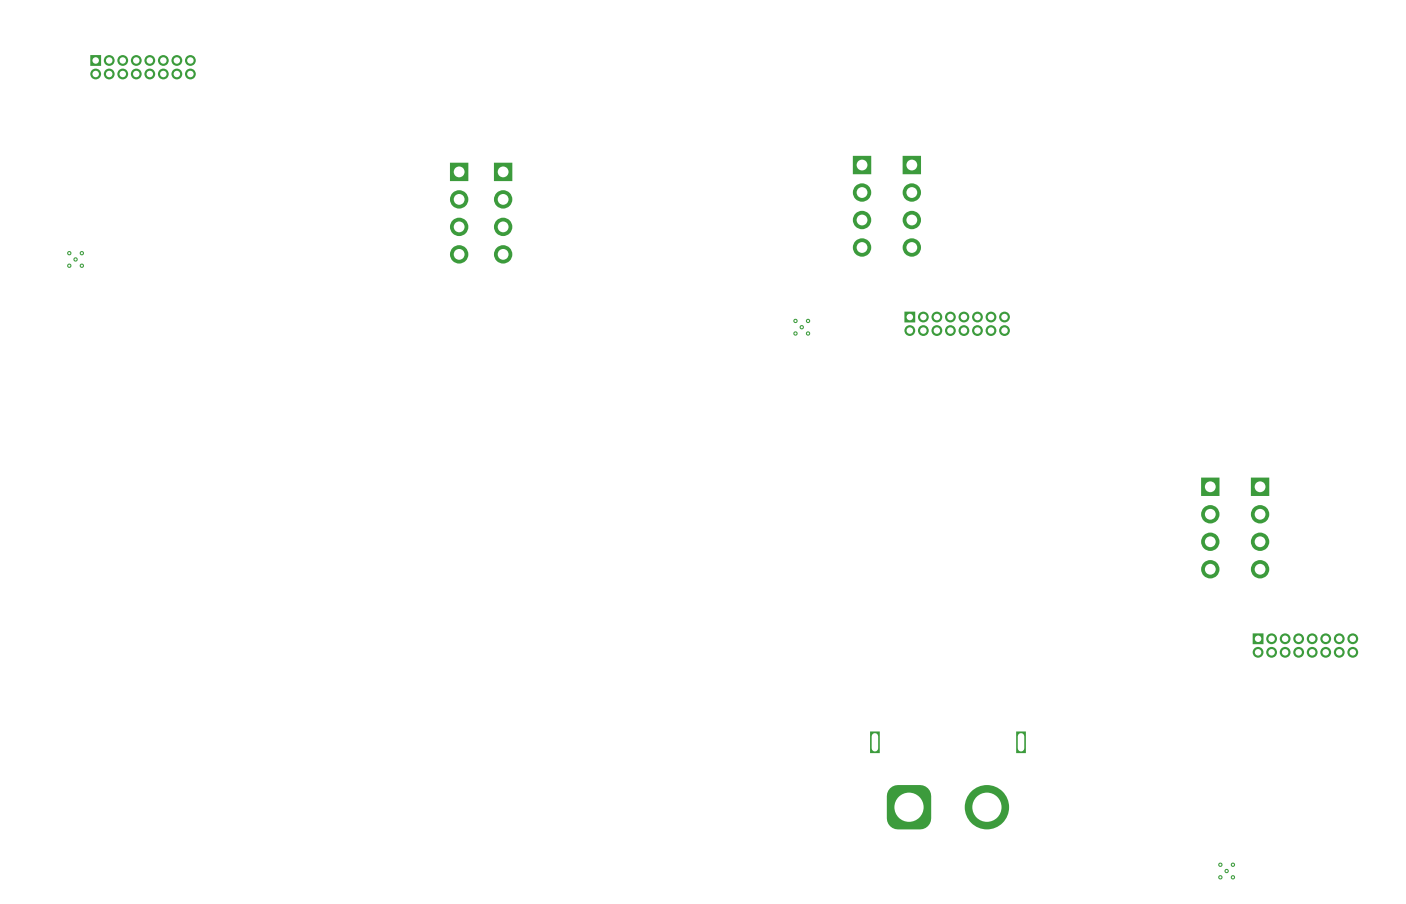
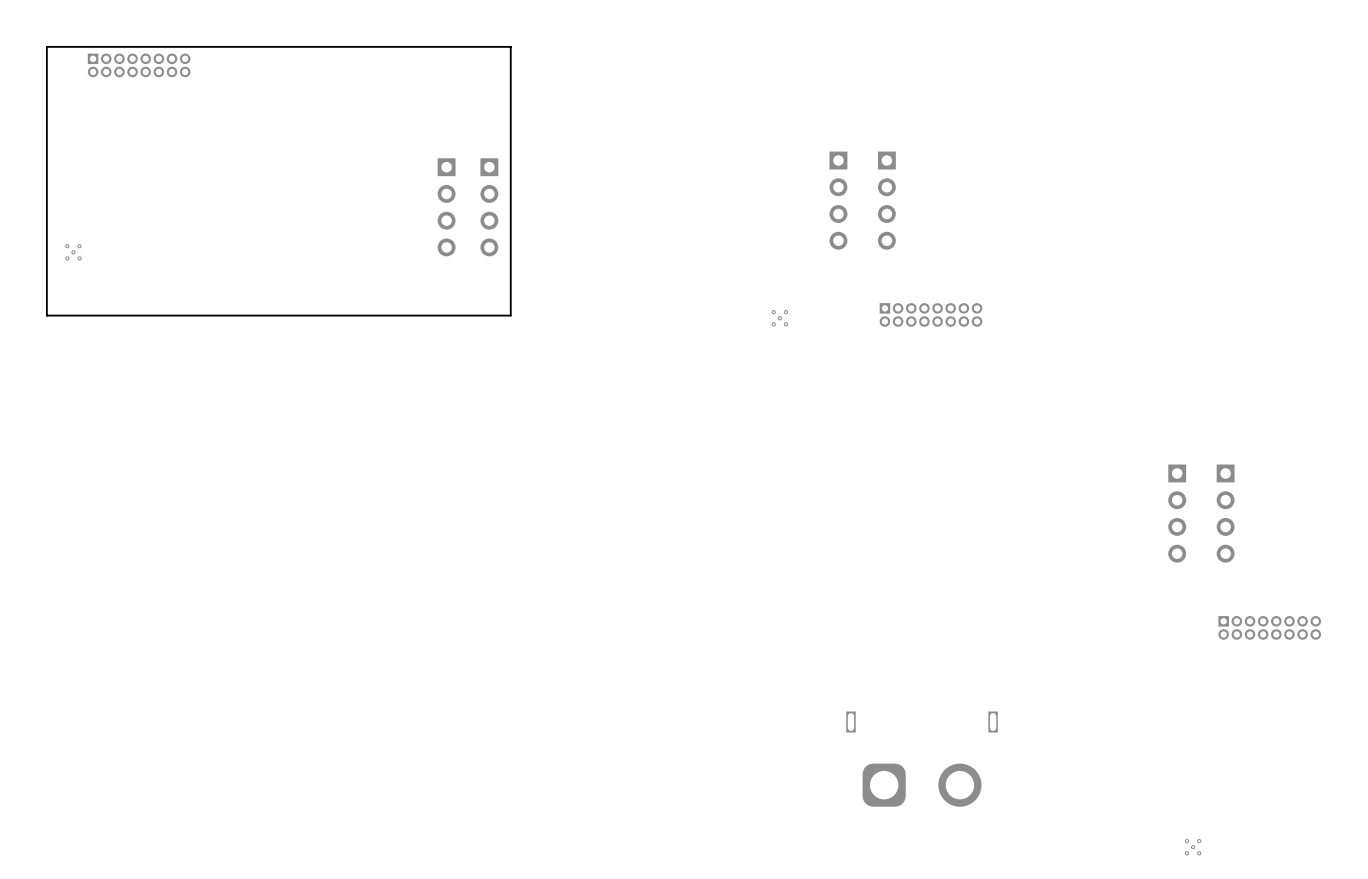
board edge: none -> (510, 46) (46, 46) (46, 315) (510, 315) (510, 46)

